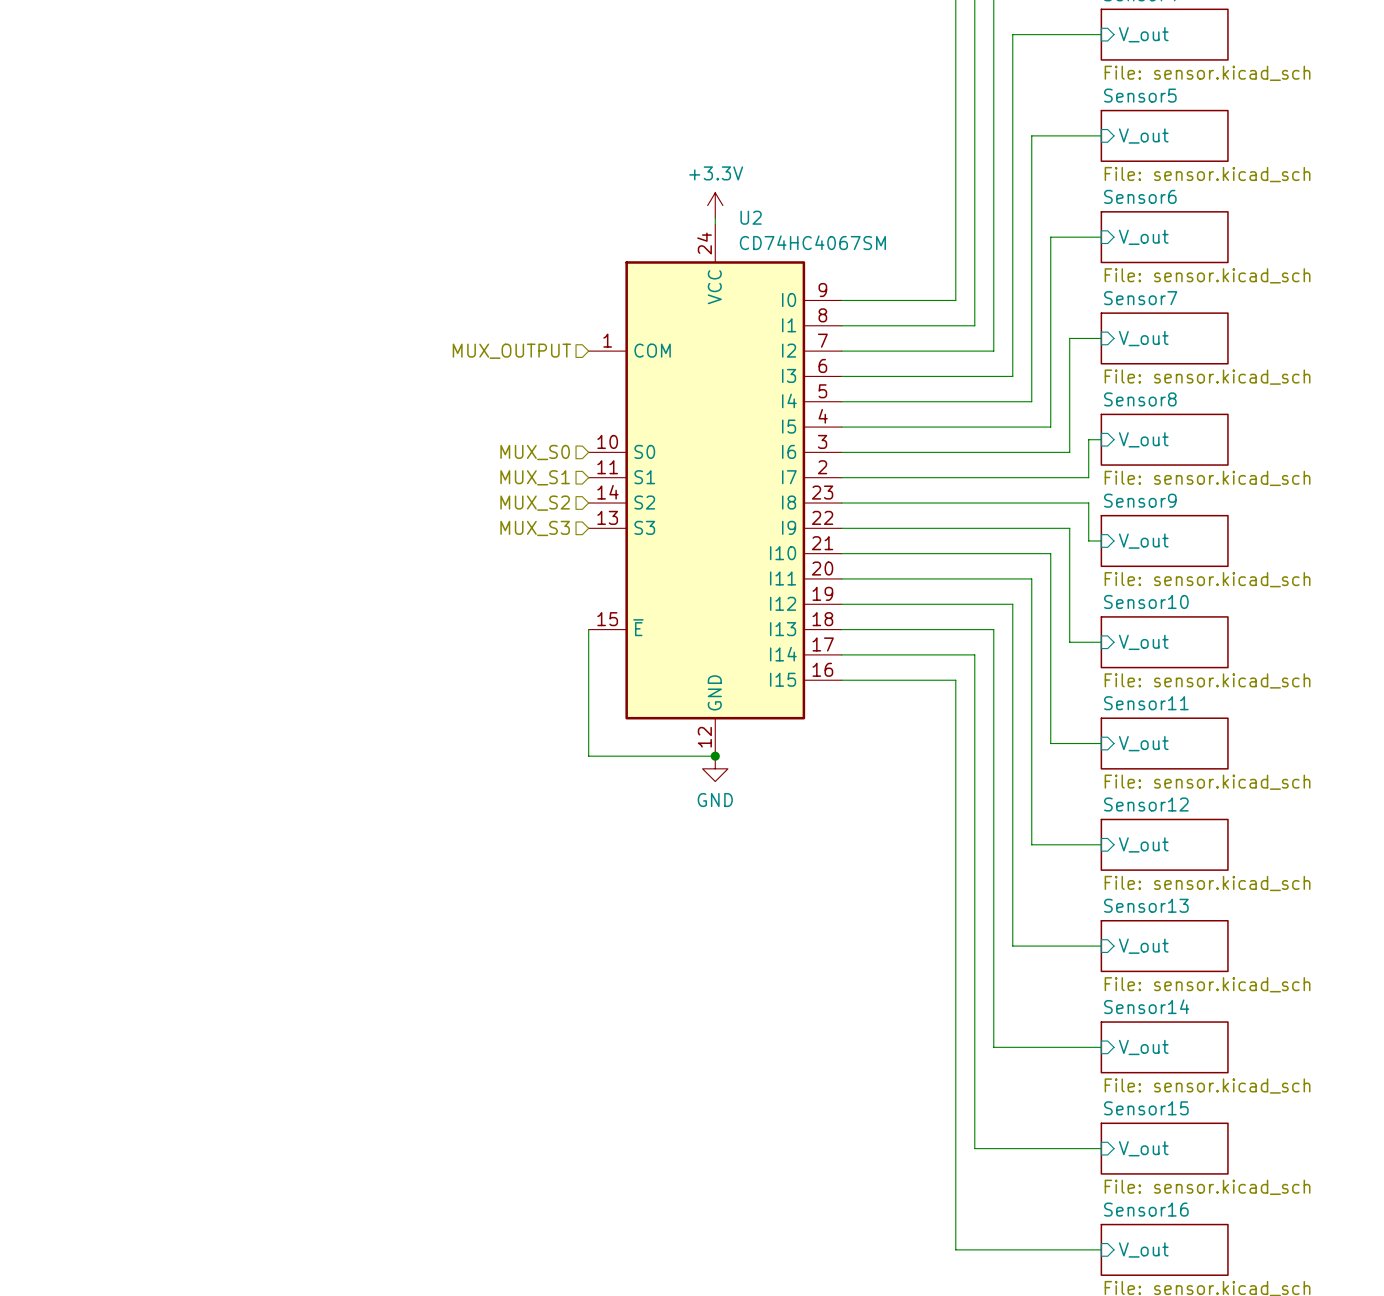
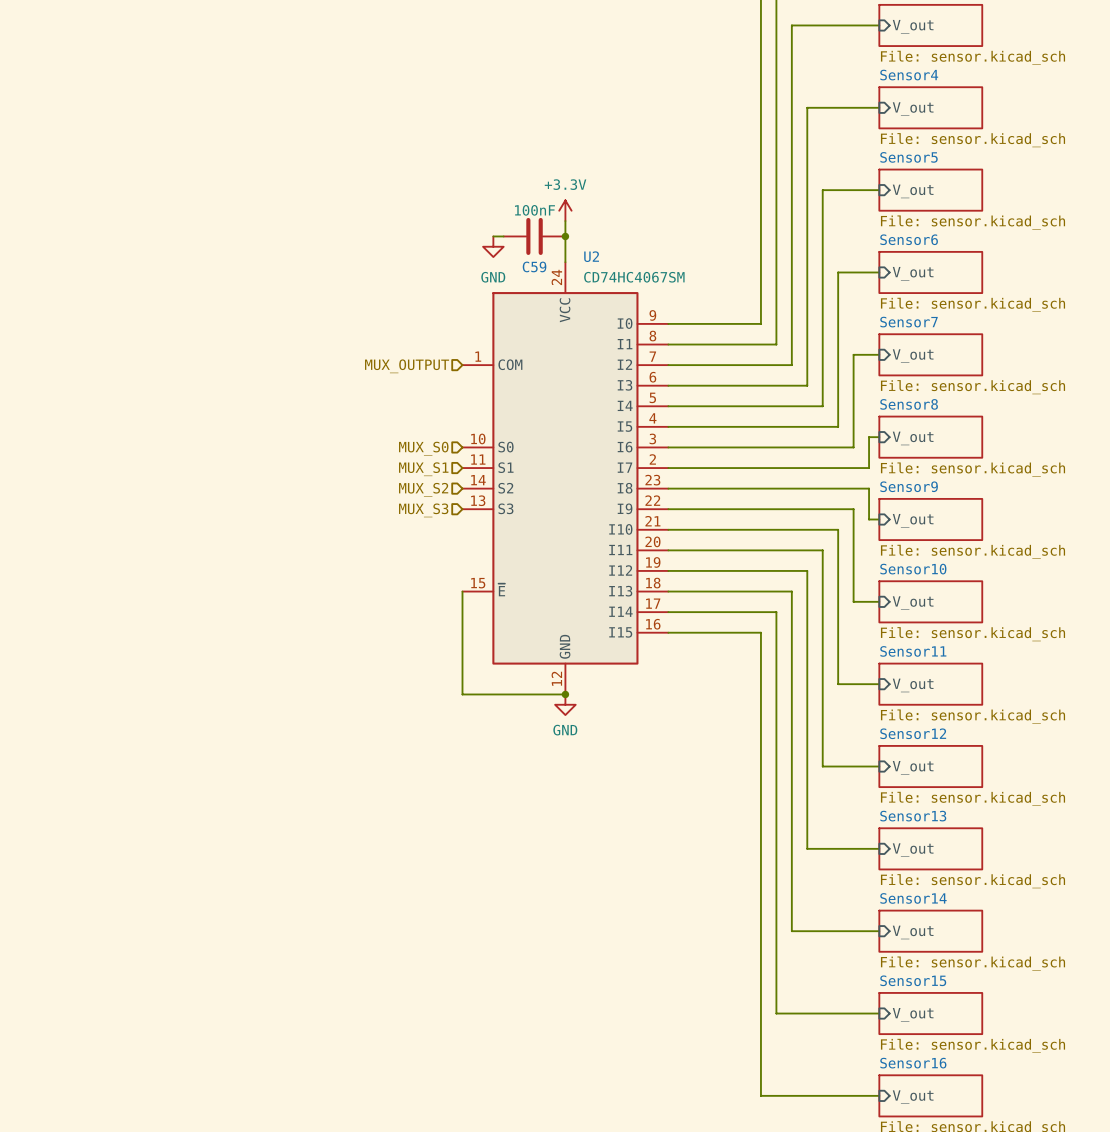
wire: none -> (493, 236) (503, 236)
C59: none -> 100nF (534, 236)
junction: none -> (565, 236)
power symbol: none -> GND (493, 246)
power symbol position: +3.3V (715, 205) -> +3.3V (565, 210)

